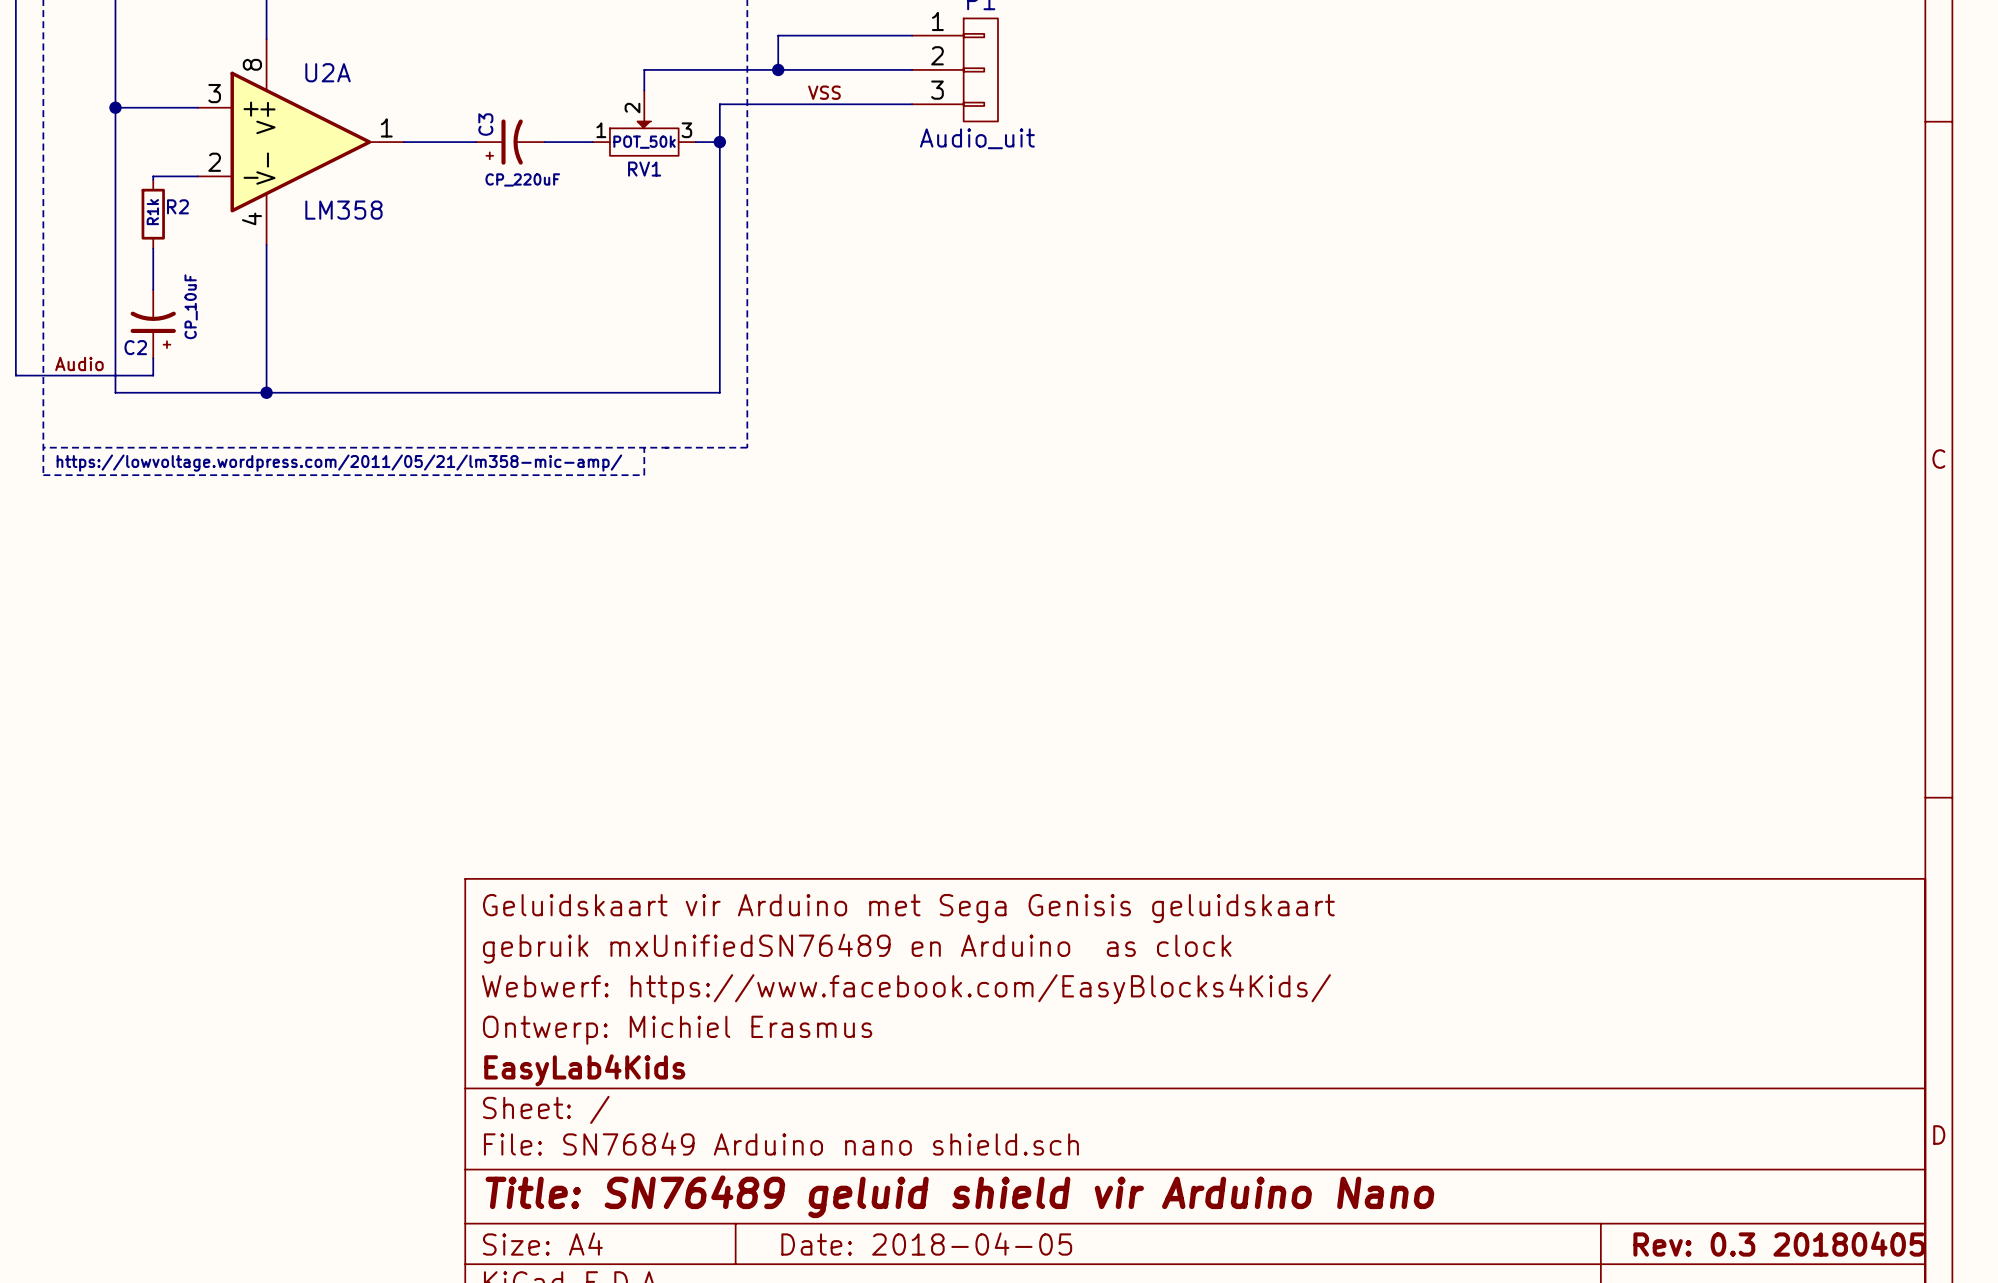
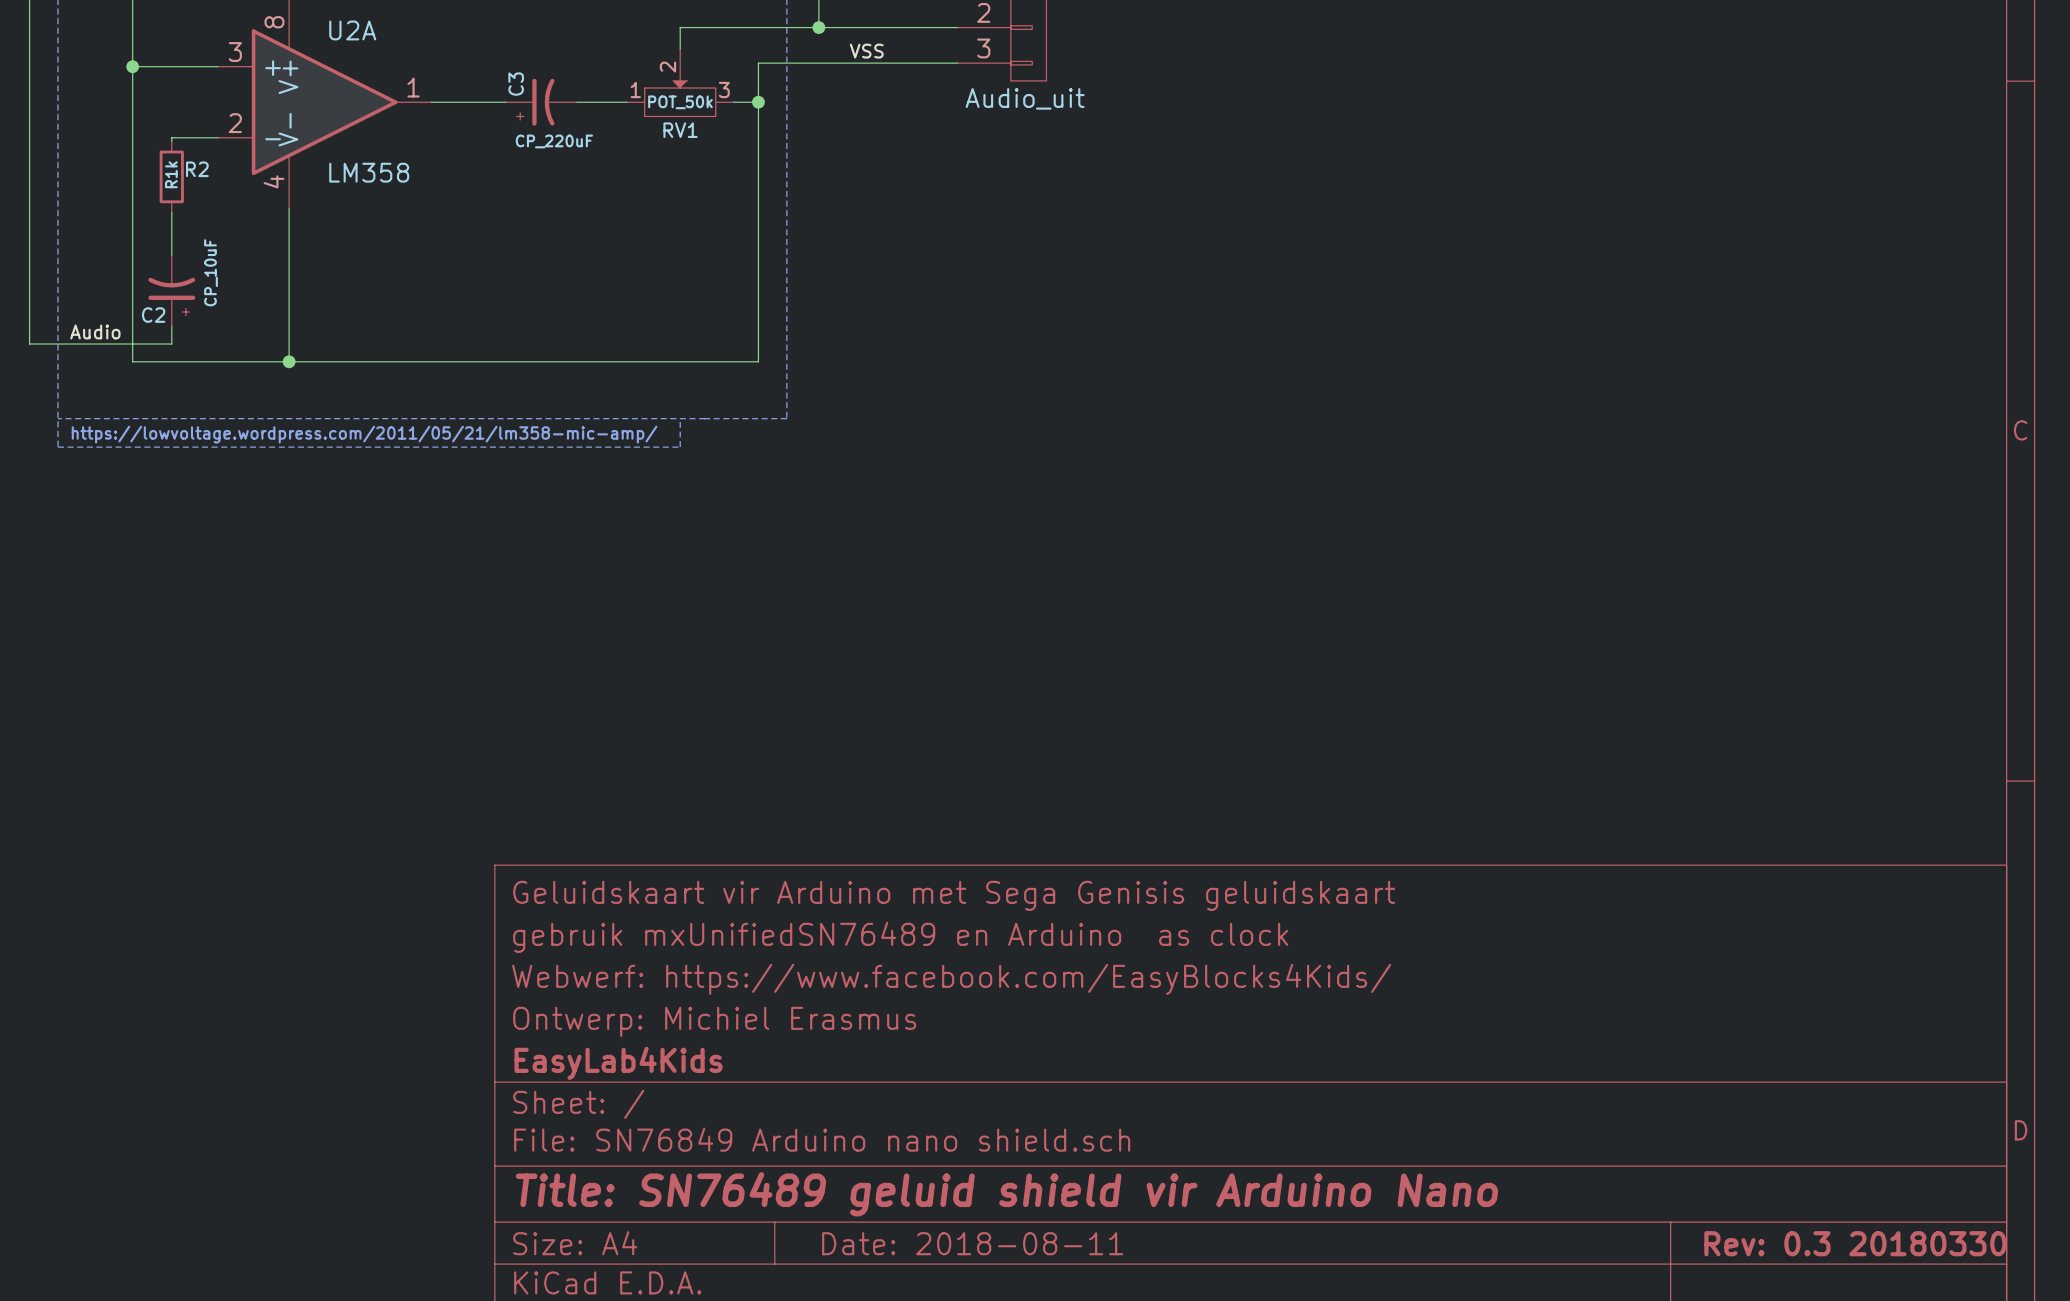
title block: Date: 2018-04-05 (926, 1244) -> Date: 2018-08-11 (972, 1243)
title block: Rev: 0.3 20180405 (1779, 1244) -> Rev: 0.3 20180330 (1855, 1243)

